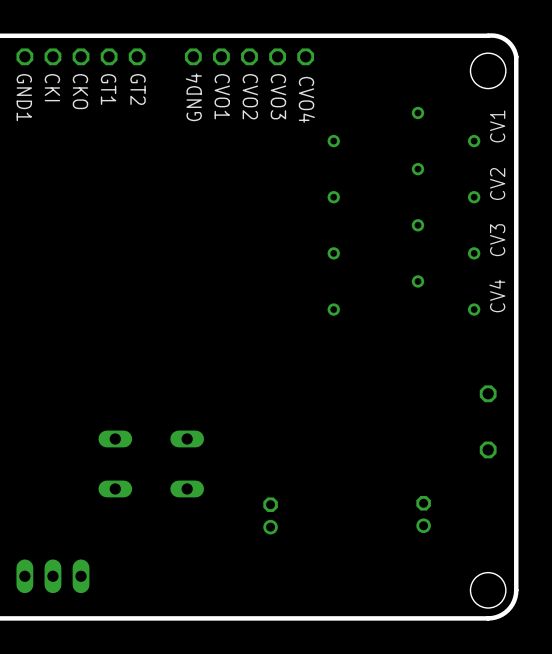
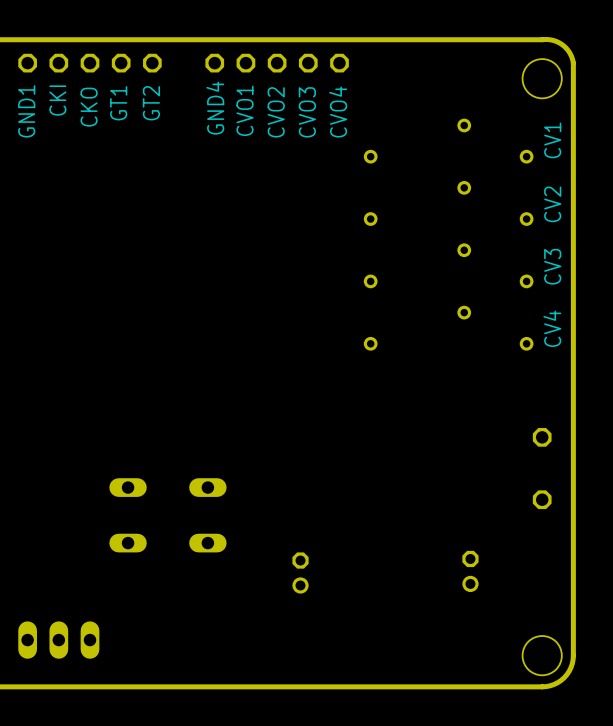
CKI name rotation: 0° (52, 87) -> 180° (57, 100)
GT1 name rotation: 0° (108, 89) -> 180° (118, 103)
GT2 name rotation: 0° (138, 89) -> 180° (151, 103)
CKO name rotation: 0° (80, 91) -> 180° (89, 107)
CVO1 name rotation: 0° (222, 96) -> 180° (245, 110)
CVO2 name rotation: 0° (250, 96) -> 180° (276, 112)
CVO3 name rotation: 0° (278, 96) -> 180° (307, 112)
GND1 name rotation: 0° (24, 97) -> 180° (26, 111)
CVO4 name rotation: 0° (306, 99) -> 180° (338, 112)

